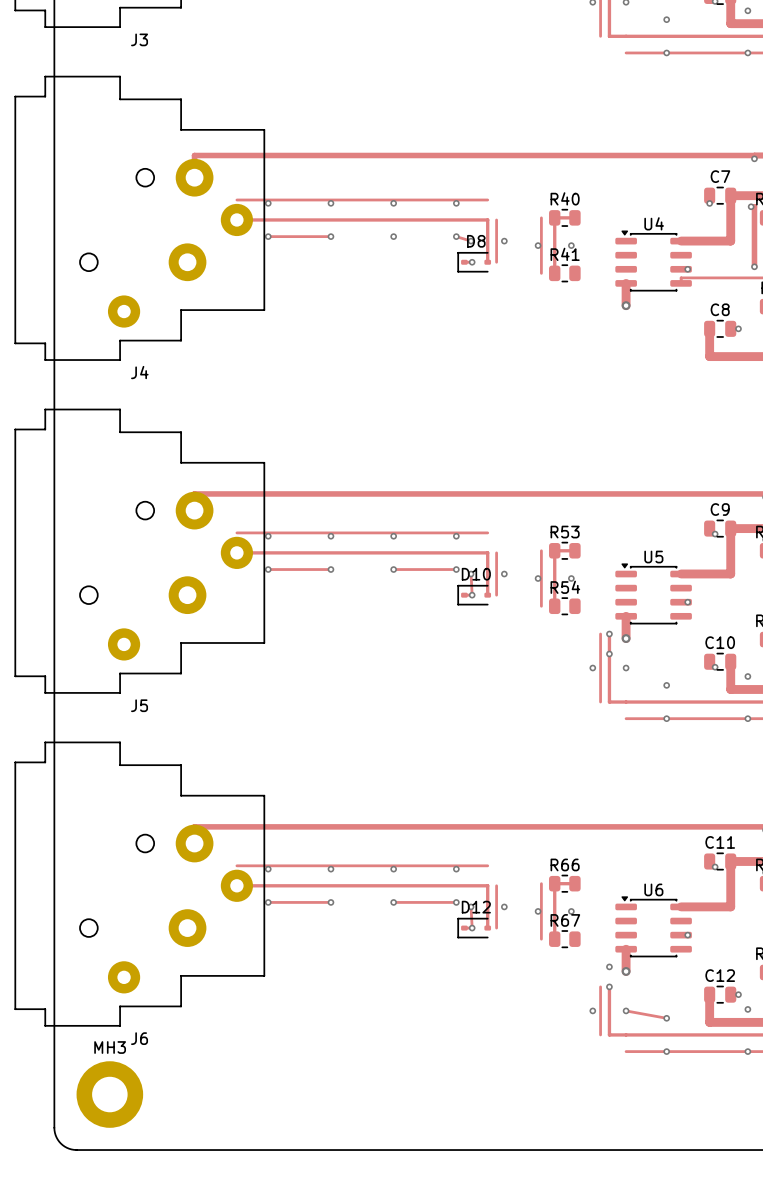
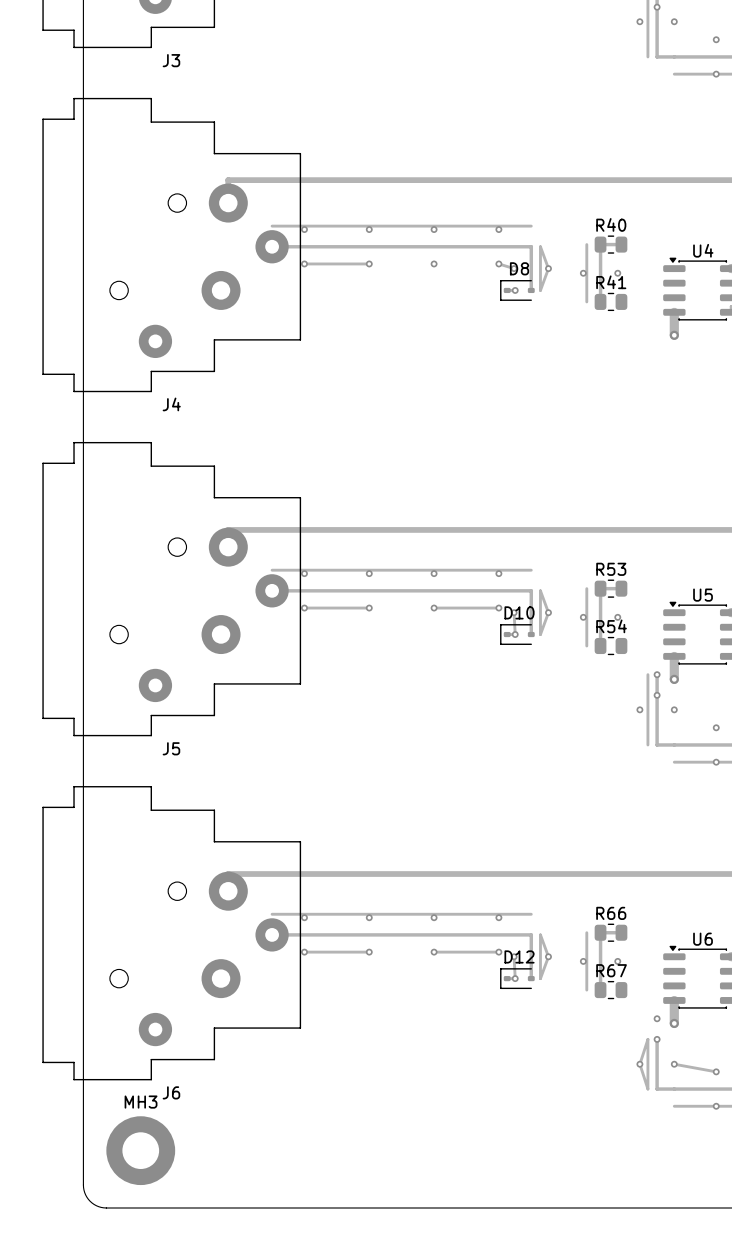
track: none -> (540, 246) (548, 268) (540, 290)
track: none -> (540, 590) (548, 612) (540, 634)
track: none -> (540, 934) (548, 956) (540, 978)
track: none -> (647, 1039) (639, 1064) (647, 1089)

